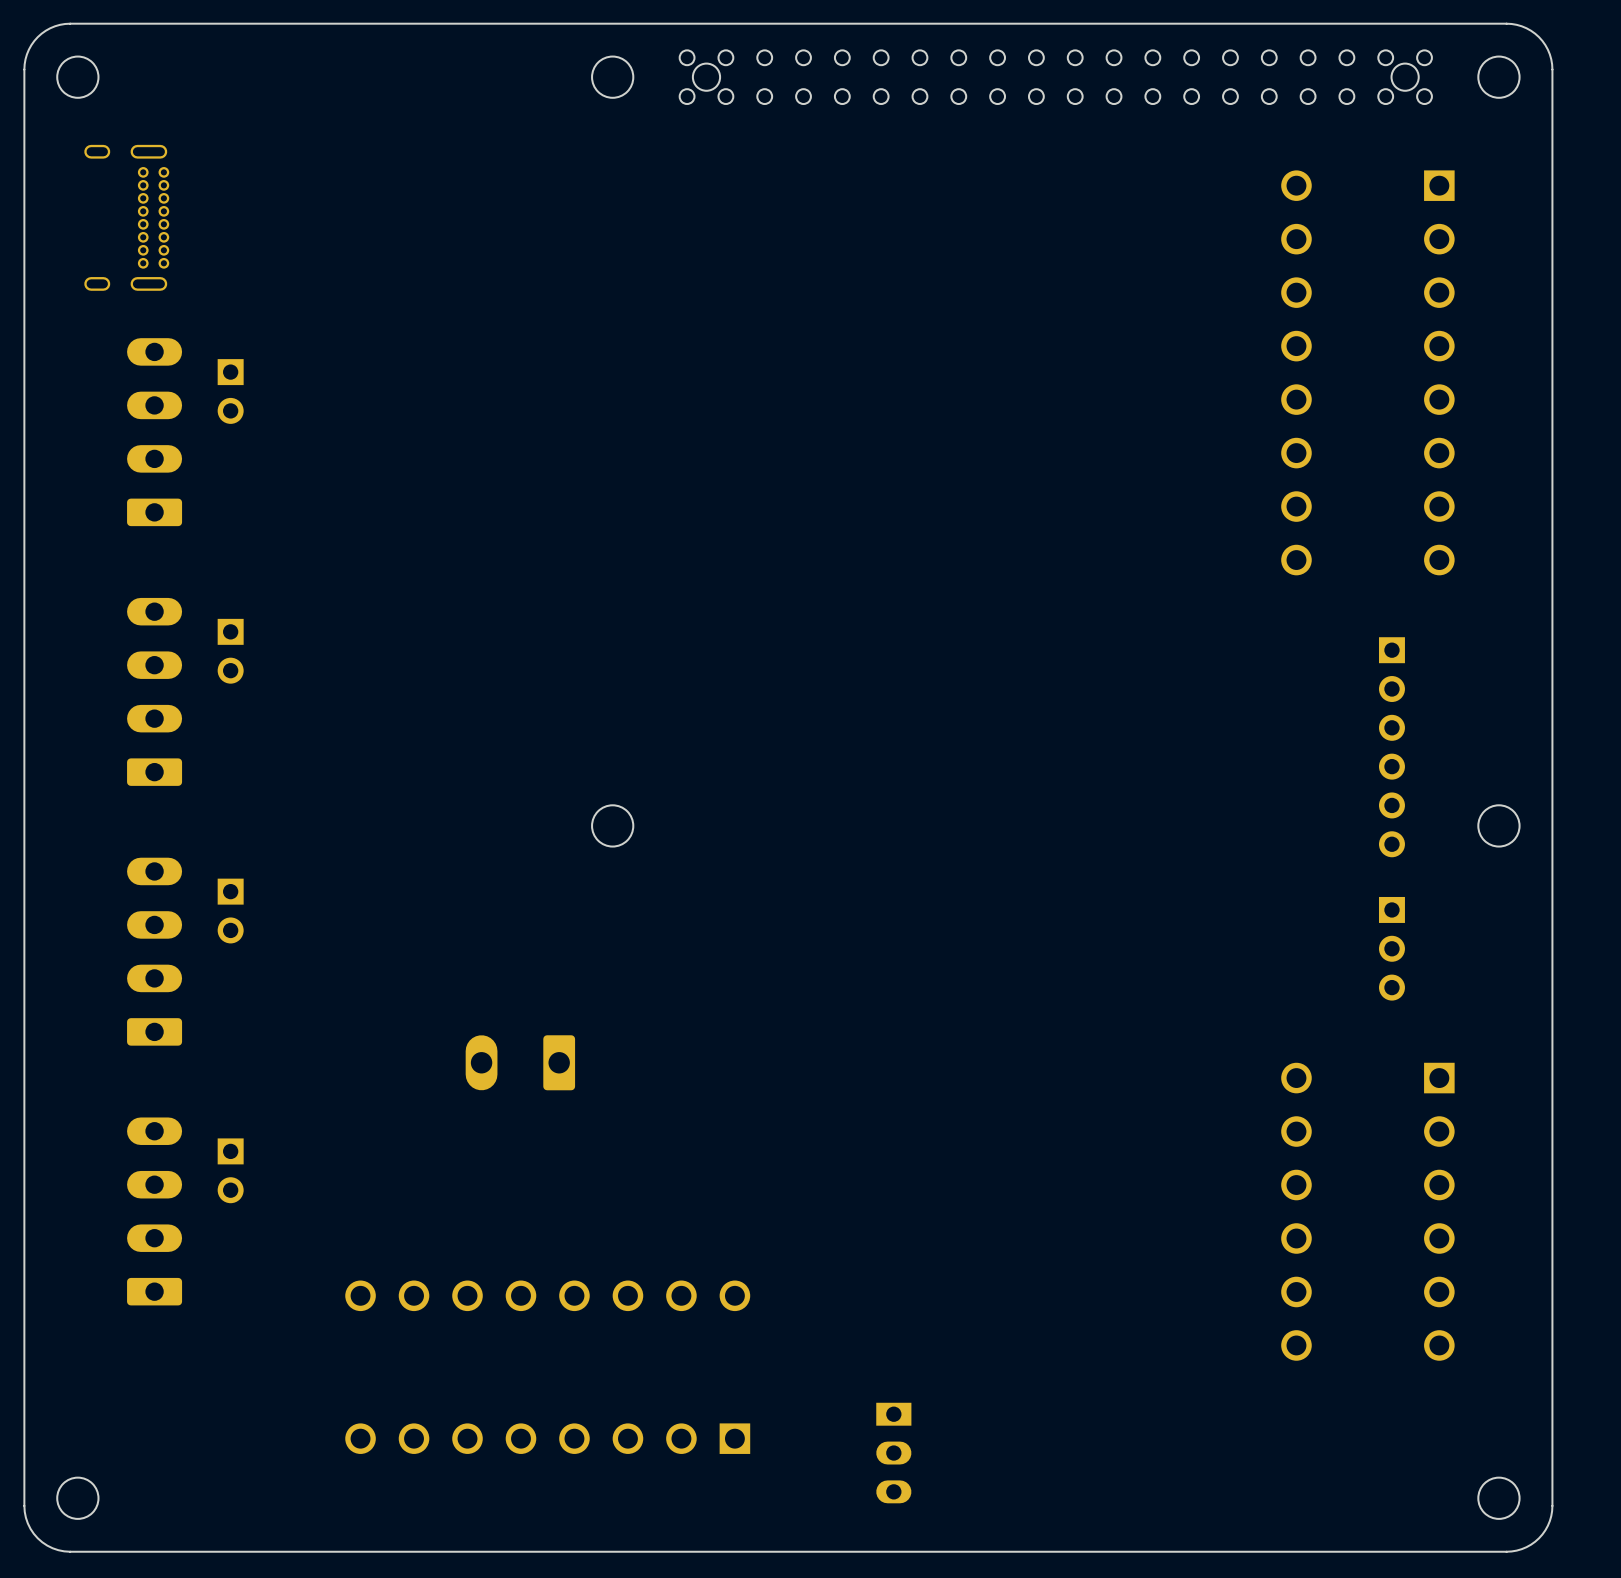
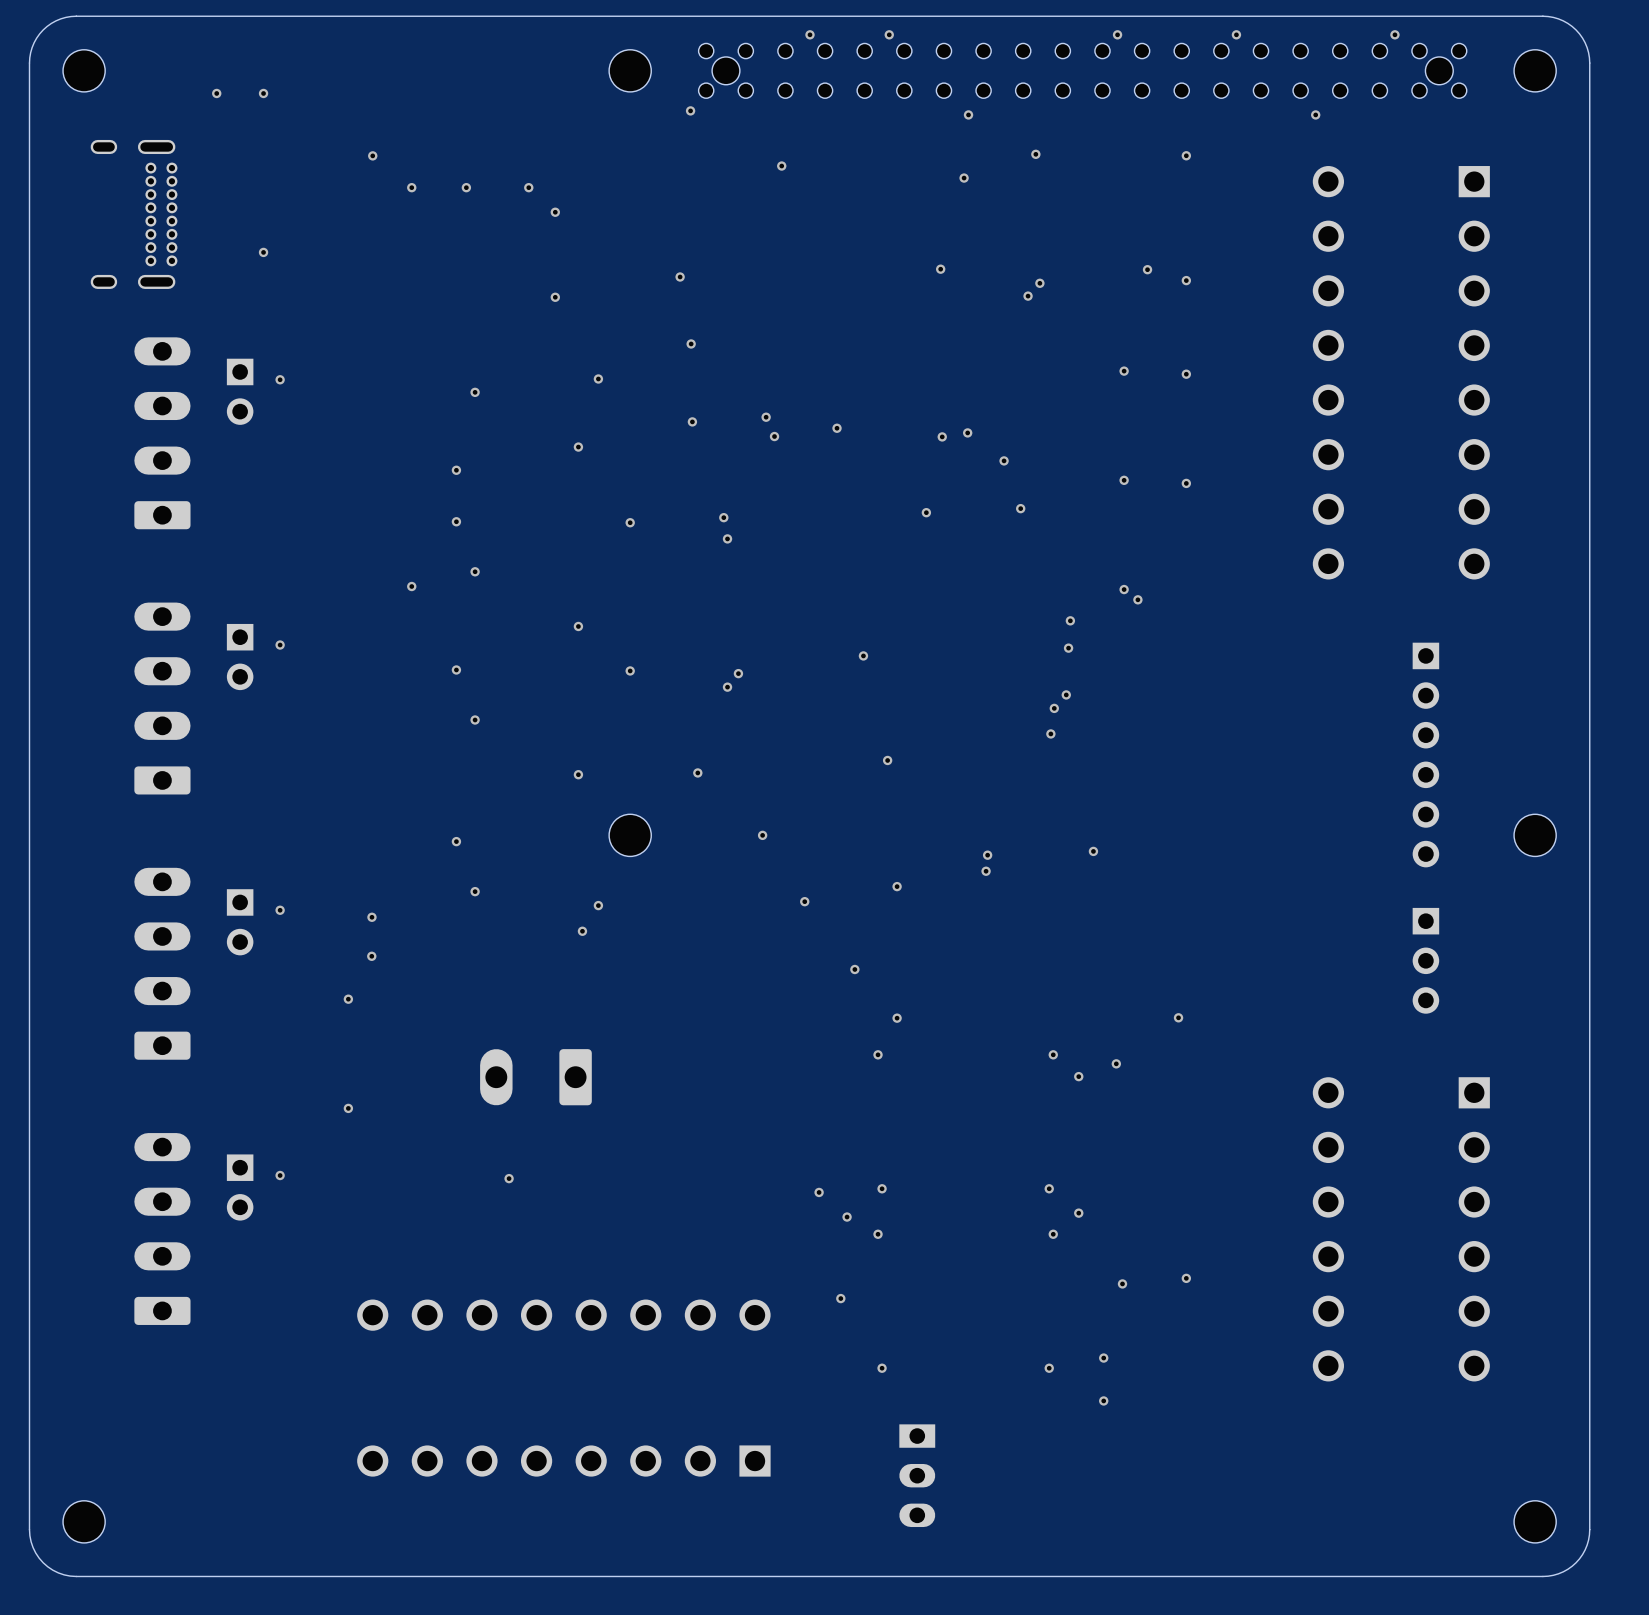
via: none -> (809, 34)
via: none -> (889, 34)
via: none -> (1117, 34)
via: none -> (1236, 34)
via: none -> (1394, 34)
via: none -> (216, 93)
via: none -> (263, 93)
via: none -> (690, 110)
via: none -> (968, 114)
via: none -> (1315, 114)
via: none -> (1035, 154)
via: none -> (372, 155)
via: none -> (1186, 155)
via: none -> (781, 166)
via: none -> (964, 178)
via: none -> (411, 187)
via: none -> (466, 187)
via: none -> (528, 187)
via: none -> (555, 212)
via: none -> (263, 252)
via: none -> (940, 269)
via: none -> (1147, 269)
via: none -> (680, 276)
via: none -> (1186, 280)
via: none -> (1039, 283)
via: none -> (1028, 296)
via: none -> (555, 297)
via: none -> (691, 343)
via: none -> (1124, 371)
via: none -> (1186, 374)
via: none -> (598, 378)
via: none -> (280, 379)
via: none -> (475, 392)
via: none -> (766, 417)
via: none -> (692, 421)
via: none -> (837, 428)
via: none -> (967, 432)
via: none -> (774, 436)
via: none -> (942, 436)
via: none -> (578, 447)
via: none -> (1004, 460)
via: none -> (456, 470)
via: none -> (1124, 480)
via: none -> (1186, 483)
via: none -> (1020, 508)
via: none -> (926, 512)
via: none -> (723, 517)
via: none -> (456, 521)
via: none -> (630, 522)
via: none -> (727, 538)
via: none -> (475, 571)
via: none -> (411, 586)
via: none -> (1124, 589)
via: none -> (1137, 599)
via: none -> (1070, 620)
via: none -> (578, 626)
via: none -> (280, 645)
via: none -> (1068, 648)
via: none -> (863, 655)
via: none -> (456, 669)
via: none -> (630, 670)
via: none -> (738, 673)
via: none -> (727, 687)
via: none -> (1066, 694)
via: none -> (1054, 708)
via: none -> (475, 720)
via: none -> (1050, 733)
via: none -> (887, 760)
via: none -> (697, 772)
via: none -> (578, 774)
via: none -> (762, 835)
via: none -> (456, 841)
via: none -> (1093, 851)
via: none -> (987, 855)
via: none -> (986, 871)
via: none -> (897, 886)
via: none -> (475, 891)
via: none -> (804, 901)
via: none -> (598, 905)
via: none -> (280, 910)
via: none -> (371, 917)
via: none -> (582, 931)
via: none -> (371, 956)
via: none -> (854, 969)
via: none -> (348, 999)
via: none -> (897, 1018)
via: none -> (1178, 1017)
via: none -> (878, 1054)
via: none -> (1053, 1054)
via: none -> (1116, 1063)
via: none -> (1078, 1076)
via: none -> (348, 1108)
via: none -> (280, 1175)
via: none -> (509, 1178)
via: none -> (882, 1188)
via: none -> (1049, 1188)
via: none -> (819, 1192)
via: none -> (1078, 1213)
via: none -> (847, 1217)
via: none -> (878, 1234)
via: none -> (1053, 1234)
via: none -> (1186, 1278)
via: none -> (1122, 1283)
via: none -> (840, 1298)
via: none -> (1103, 1358)
via: none -> (882, 1368)
via: none -> (1049, 1368)
via: none -> (1103, 1400)

